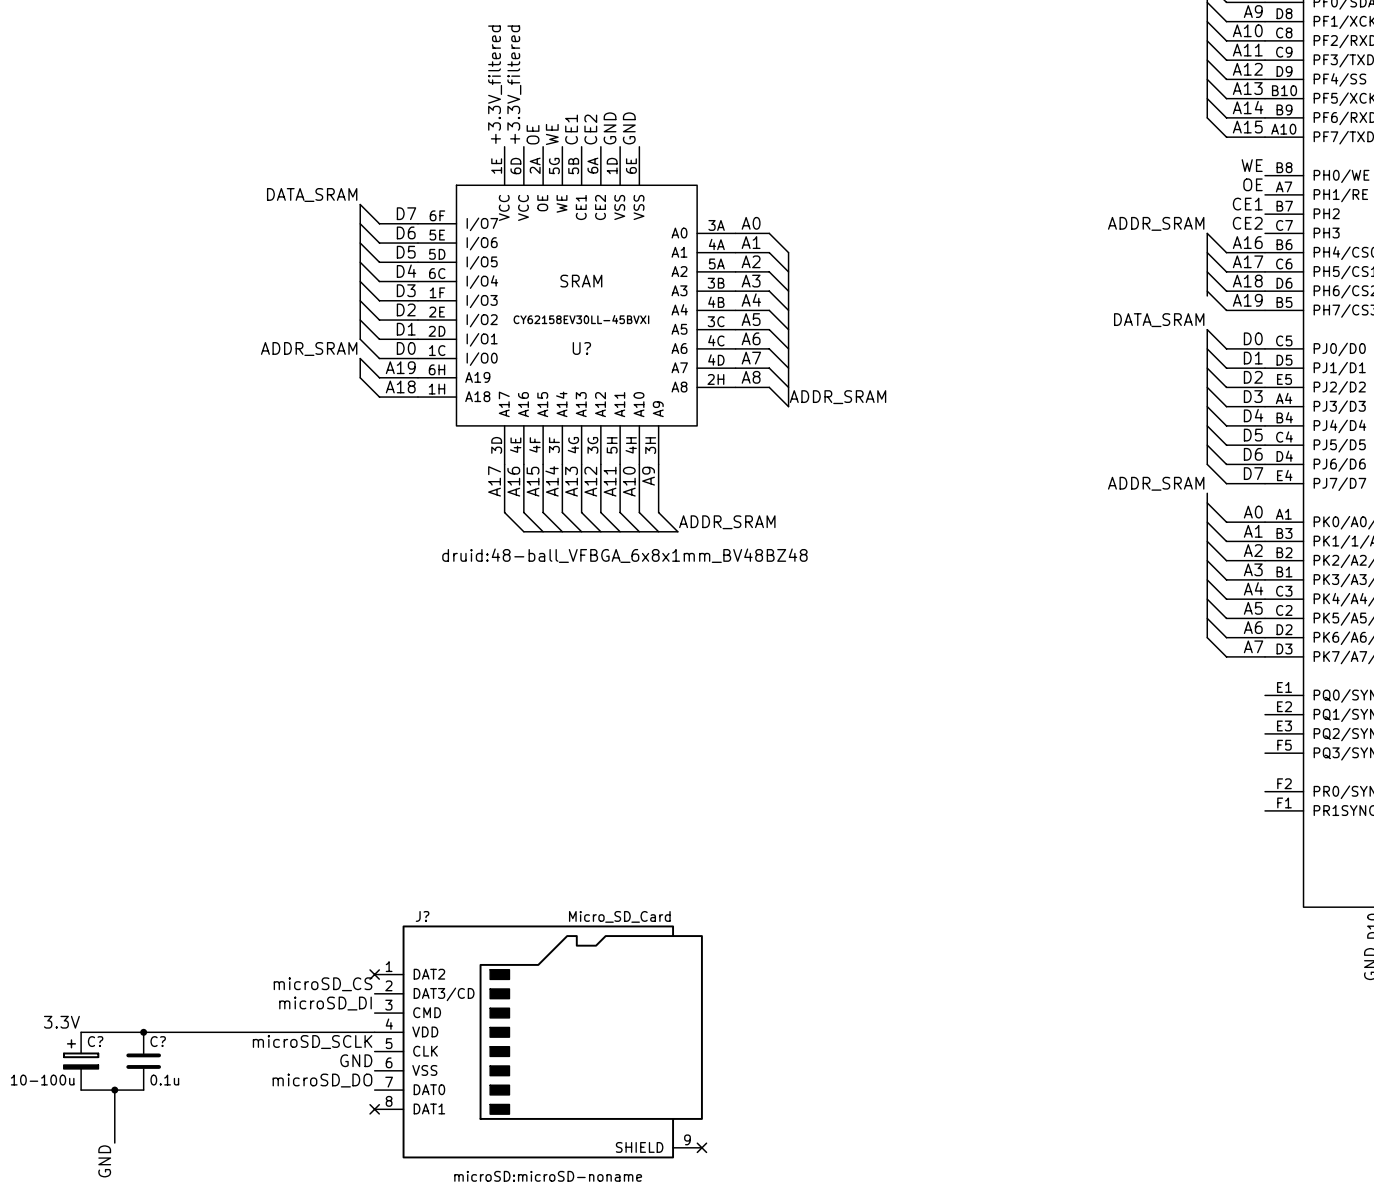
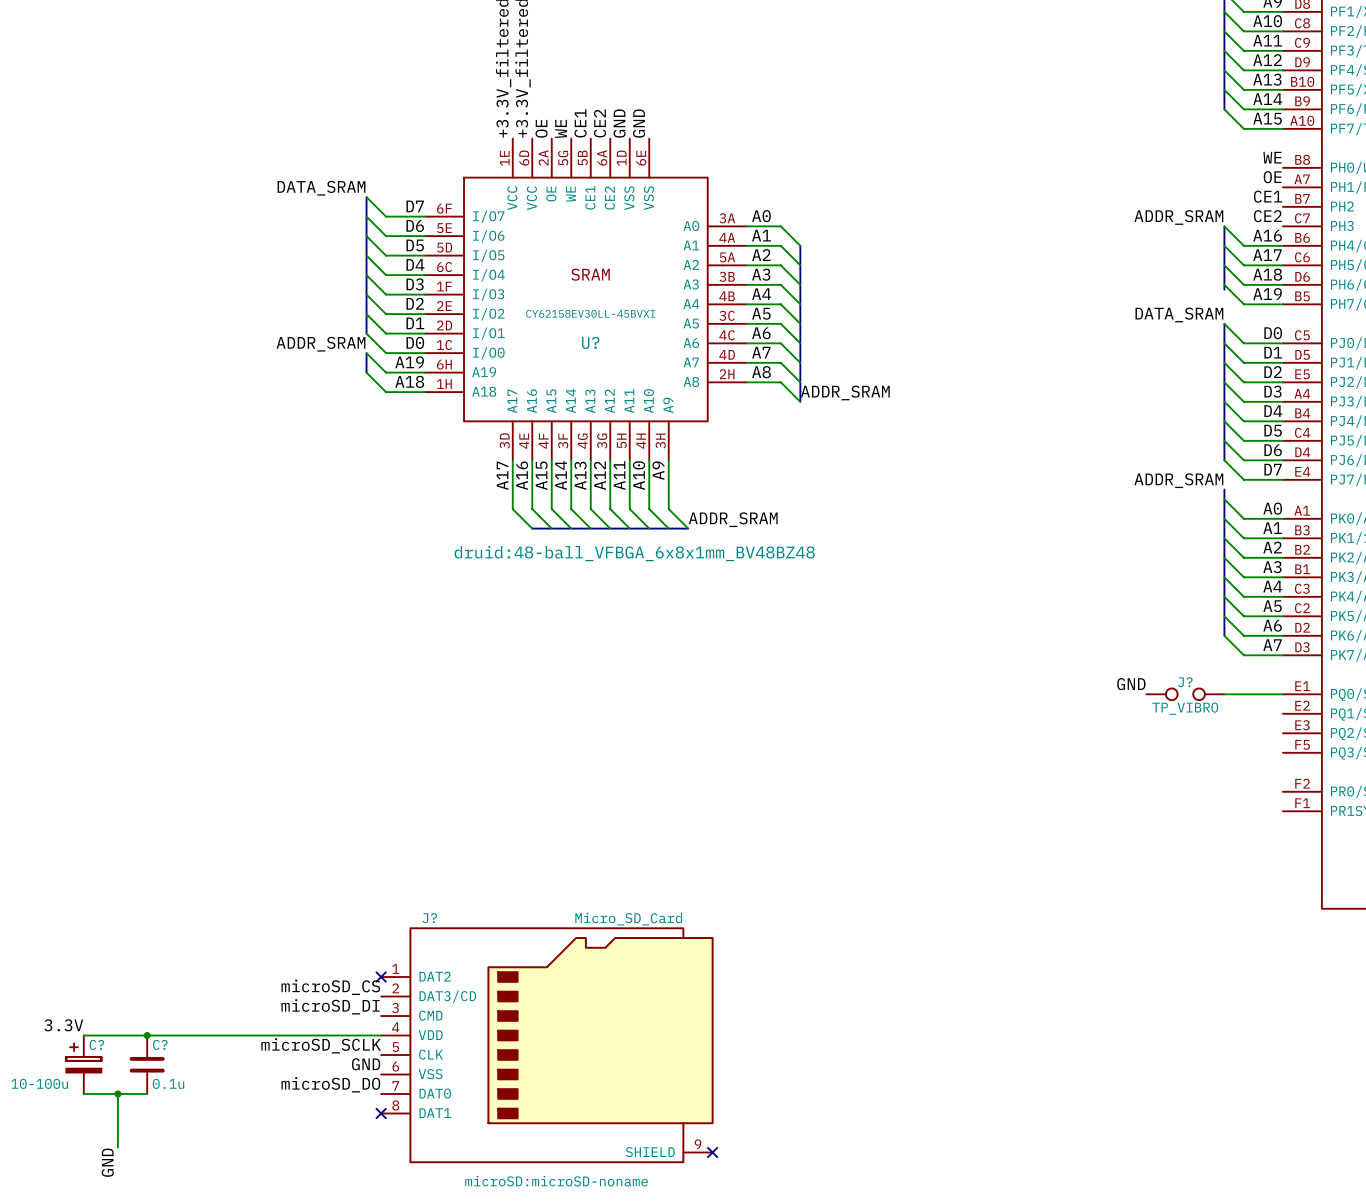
label: none -> GND (1131, 684)
J?: none -> TP_VIBRO (1185, 694)
wire: none -> (1224, 694) (1282, 694)

